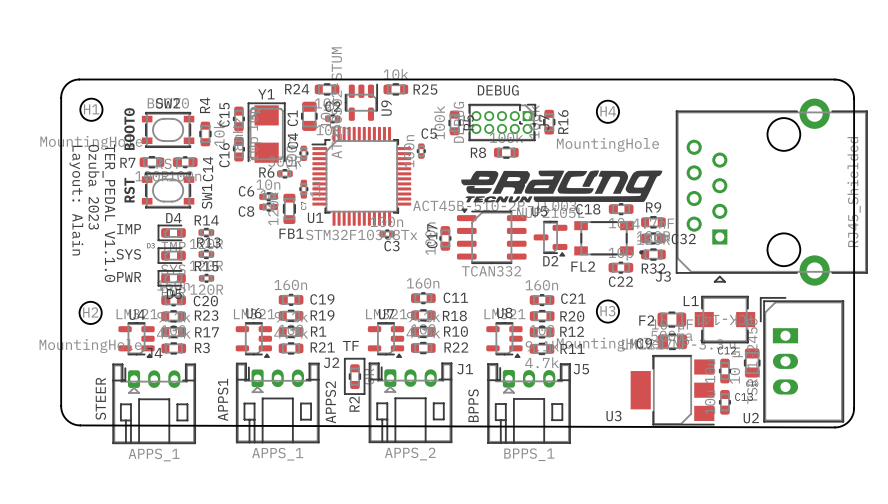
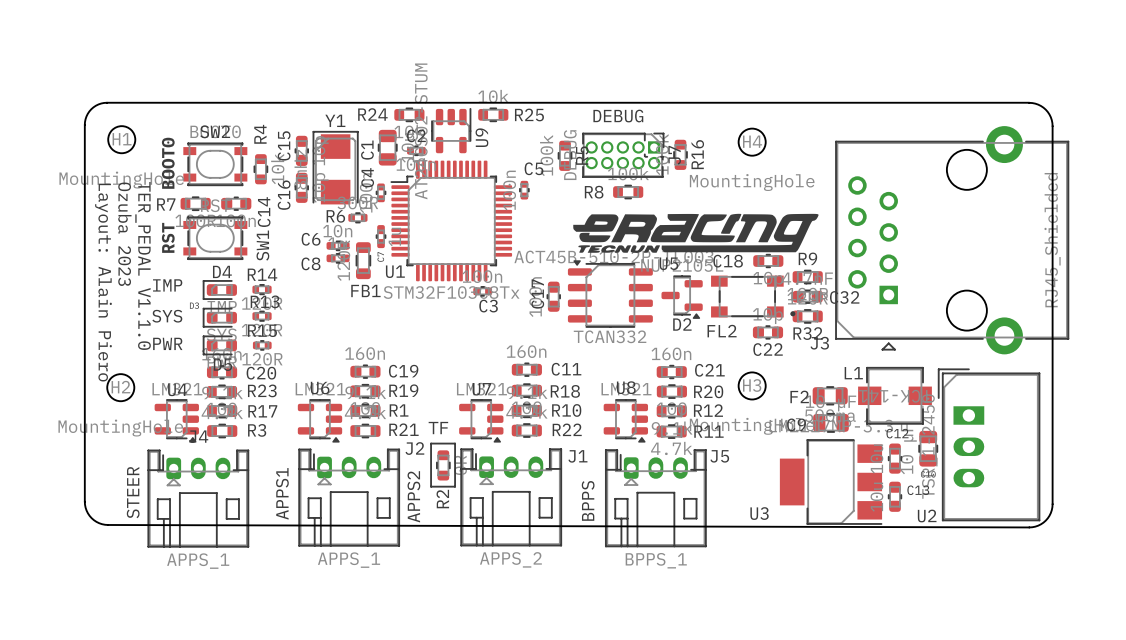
text: Layout: Alain (76, 200) -> Layout: Alain Piero (103, 282)

